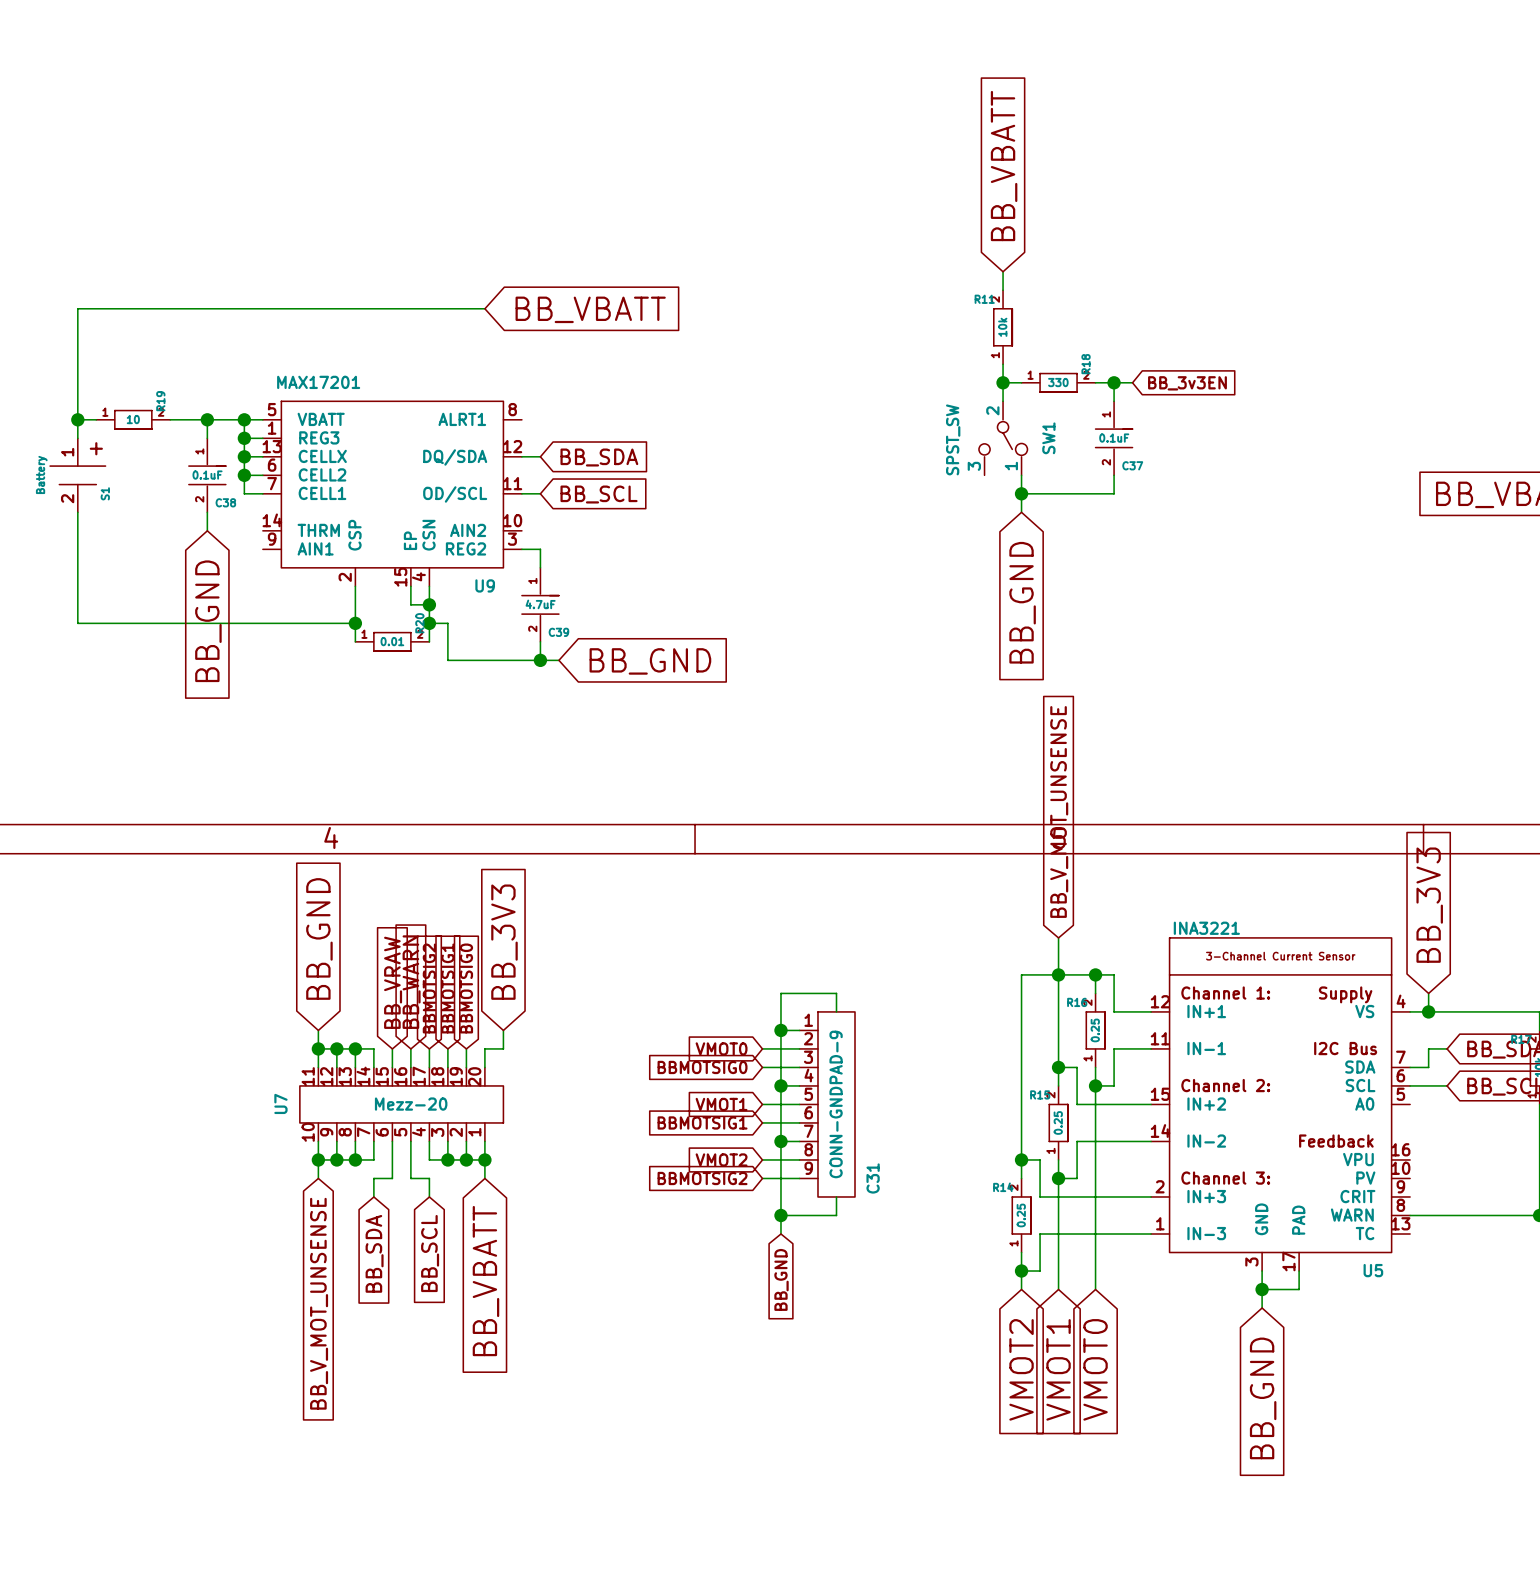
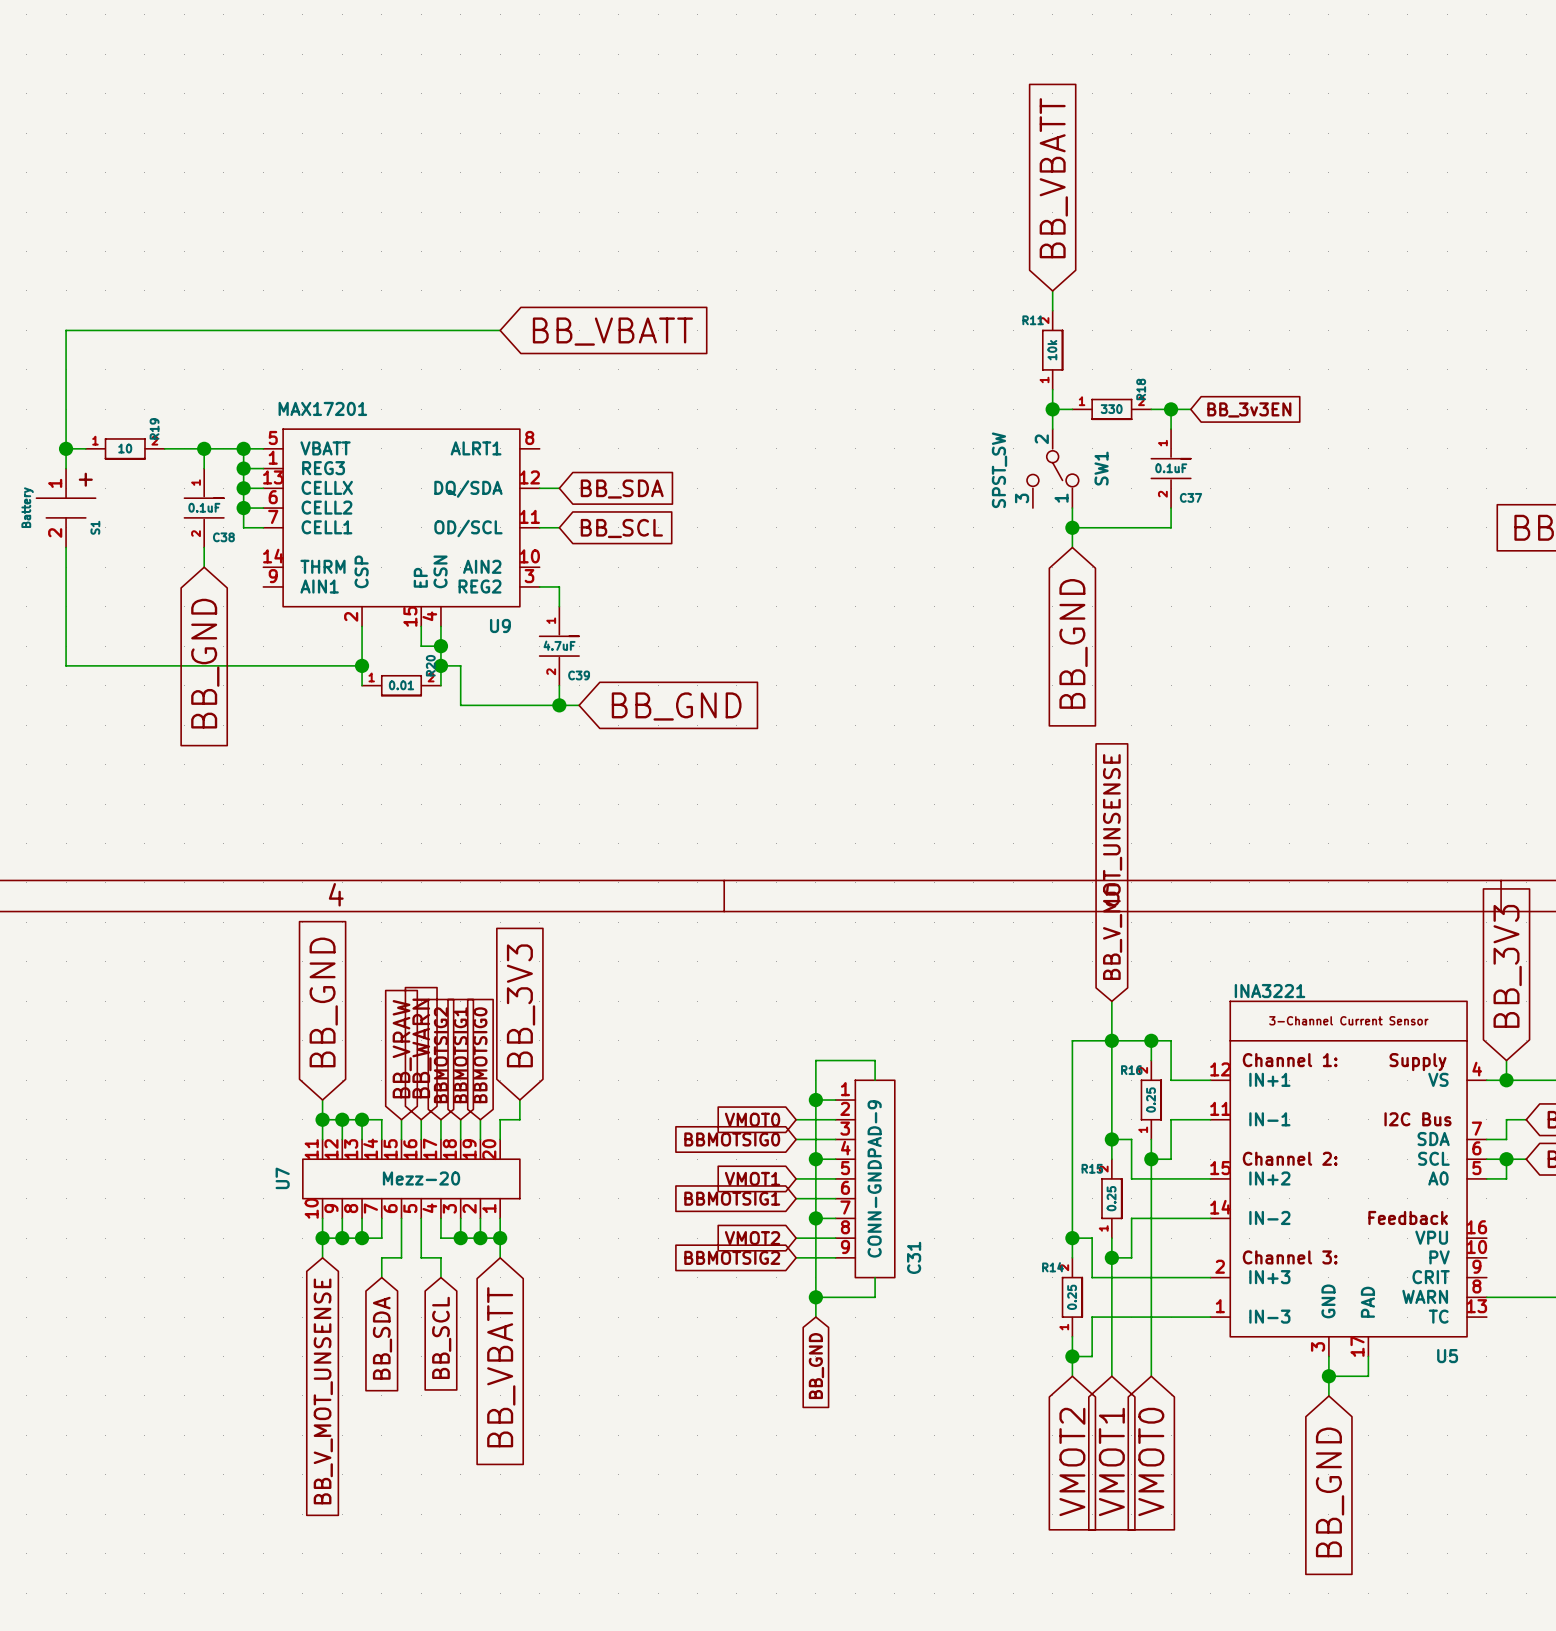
wire: none -> (1506, 1159) (1506, 1178) (1486, 1178)
junction: none -> (1506, 1159)

